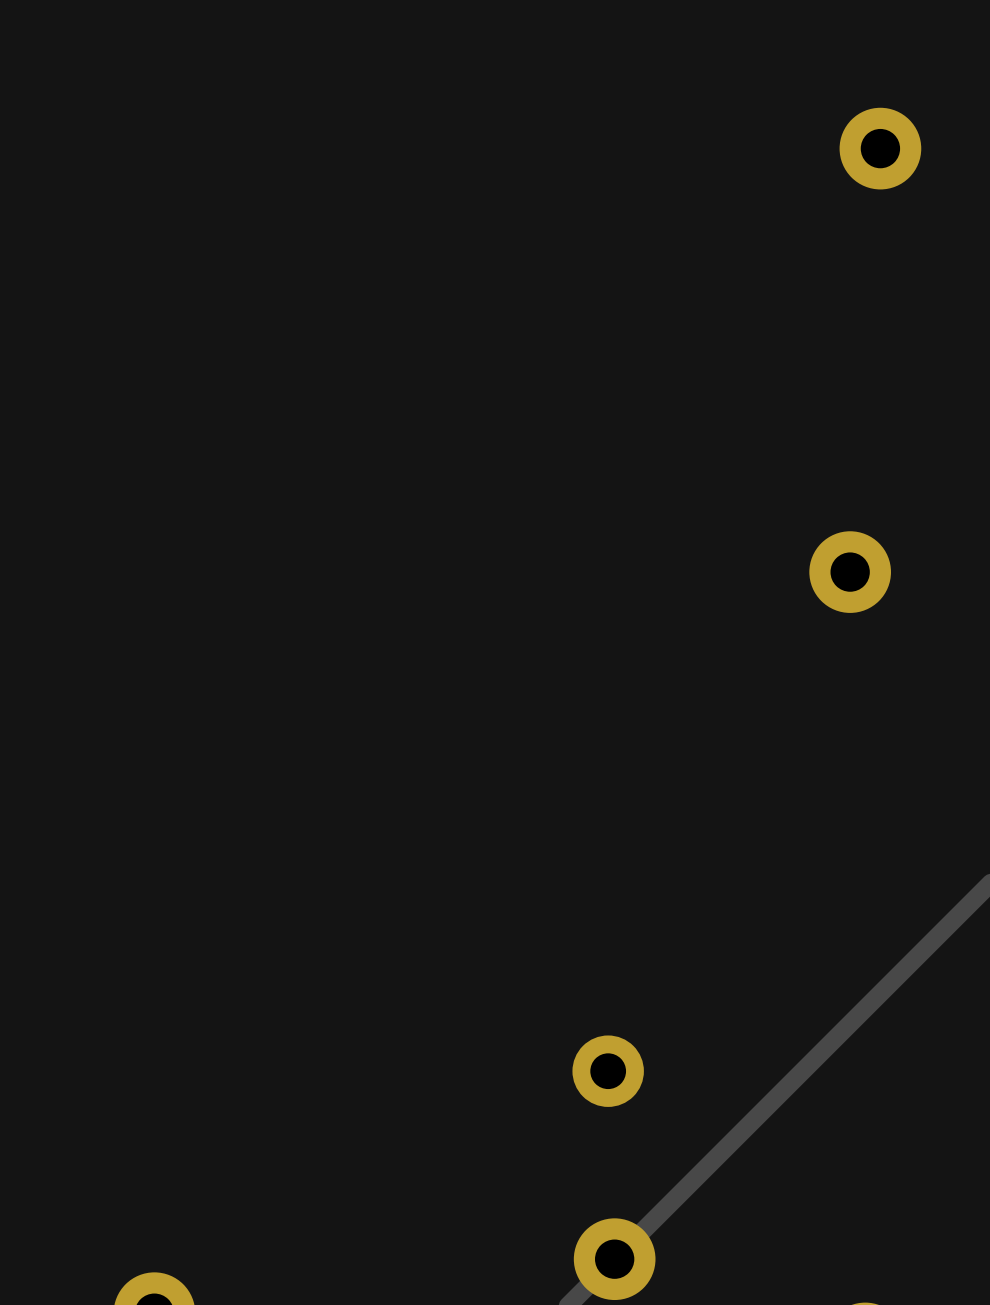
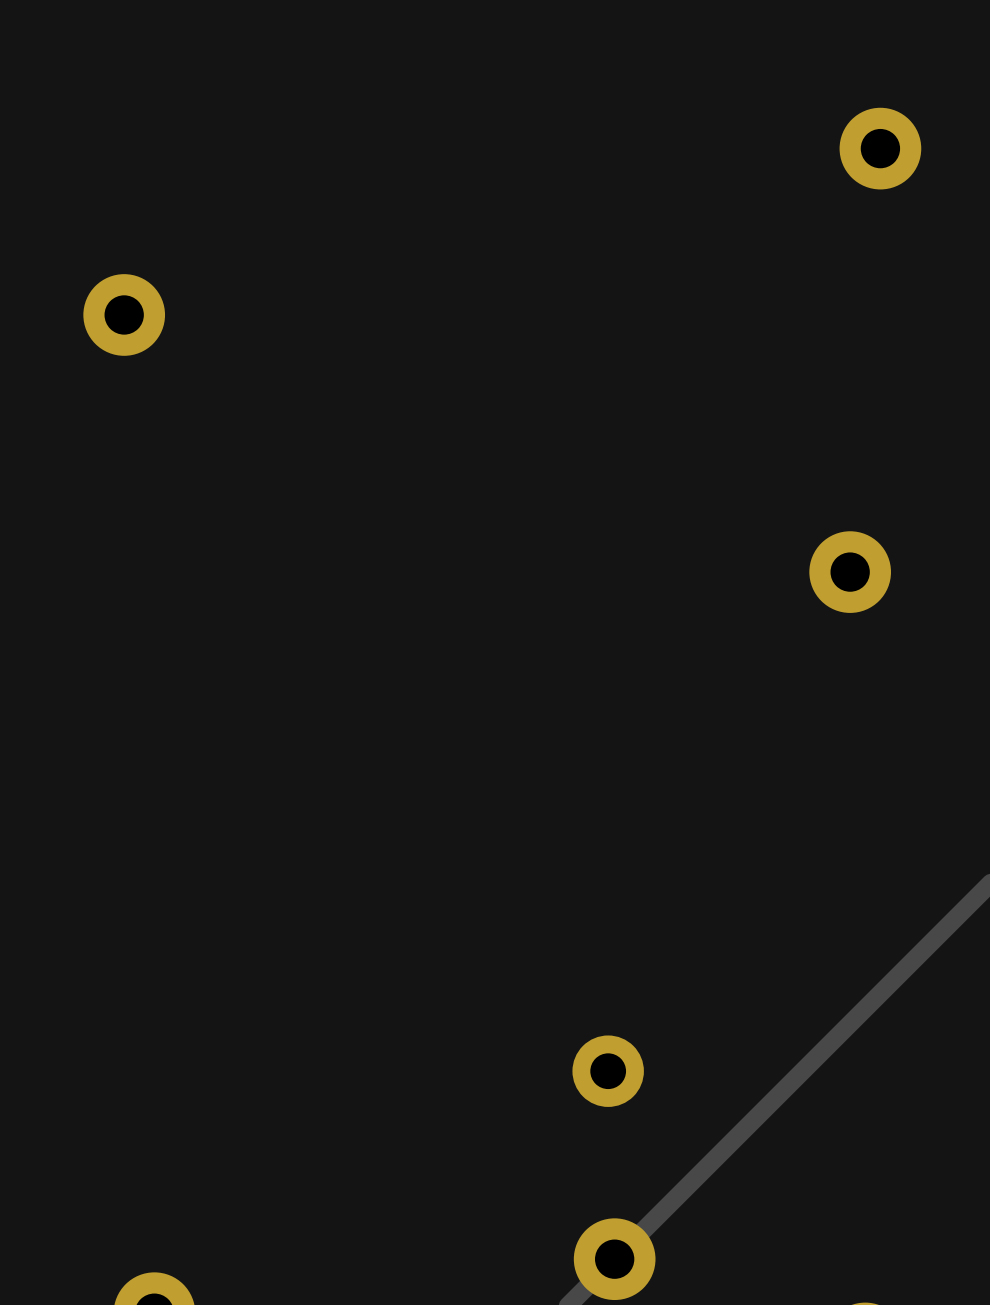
via: none -> (124, 314)

